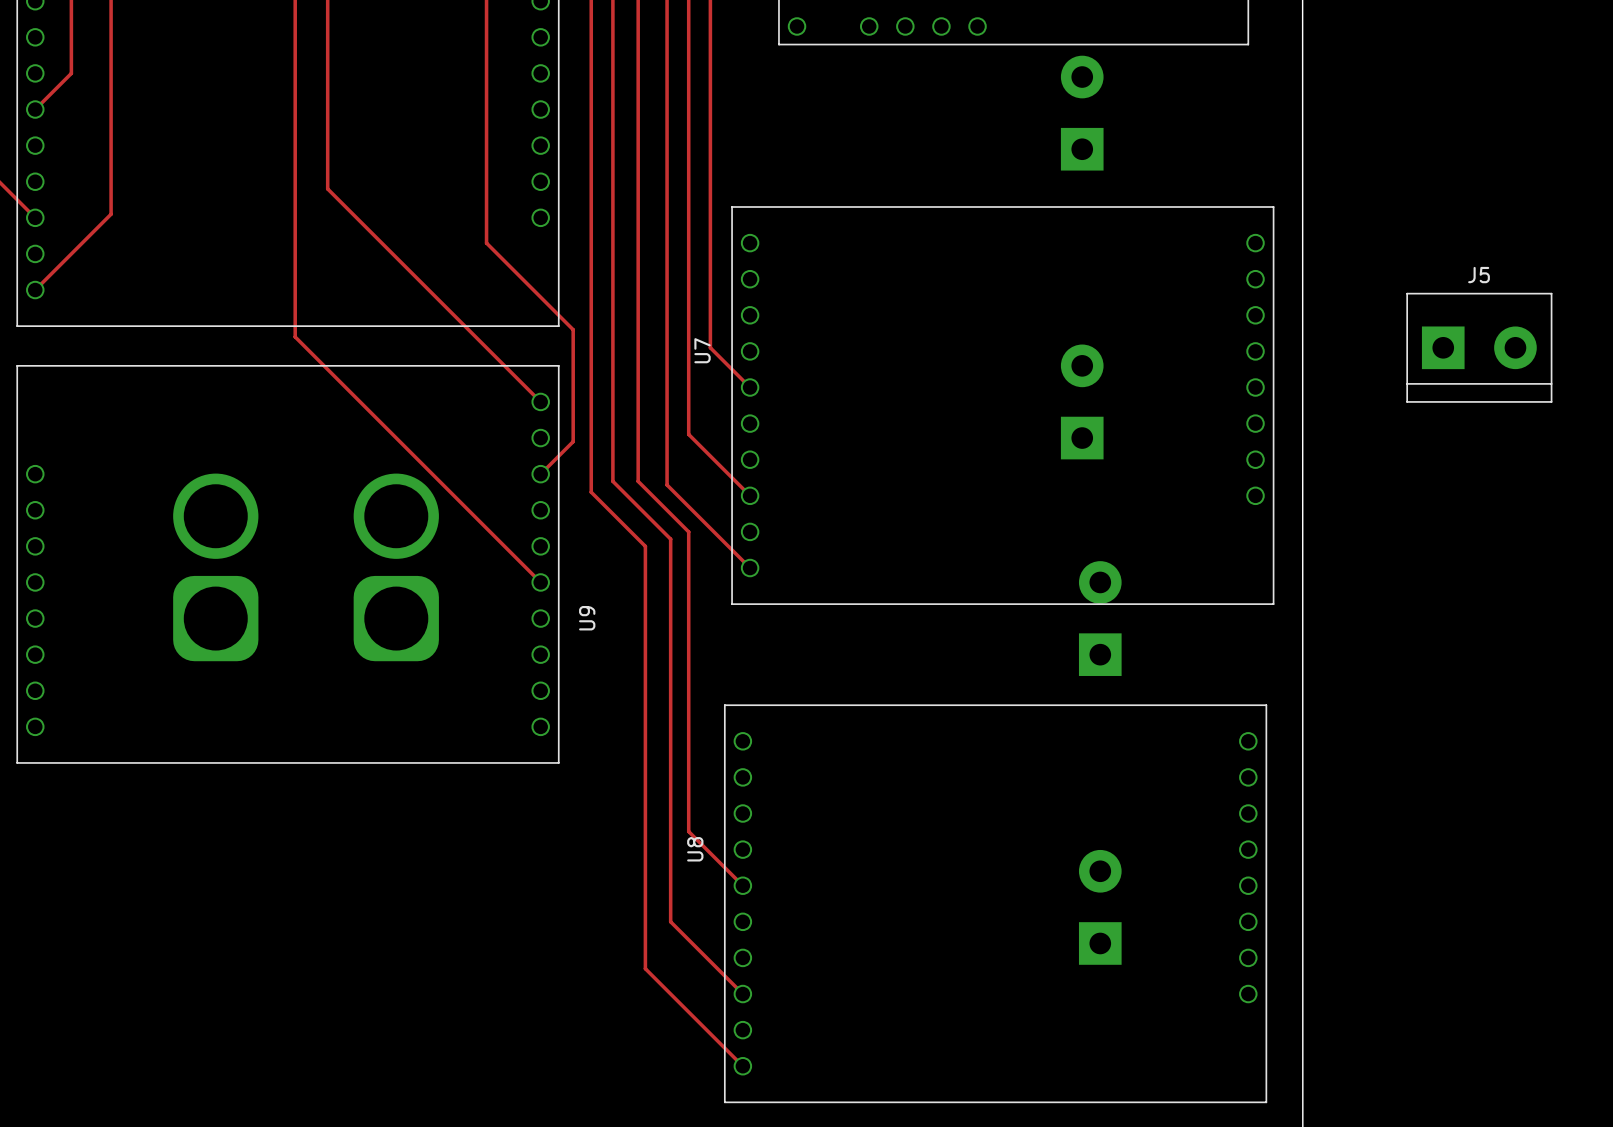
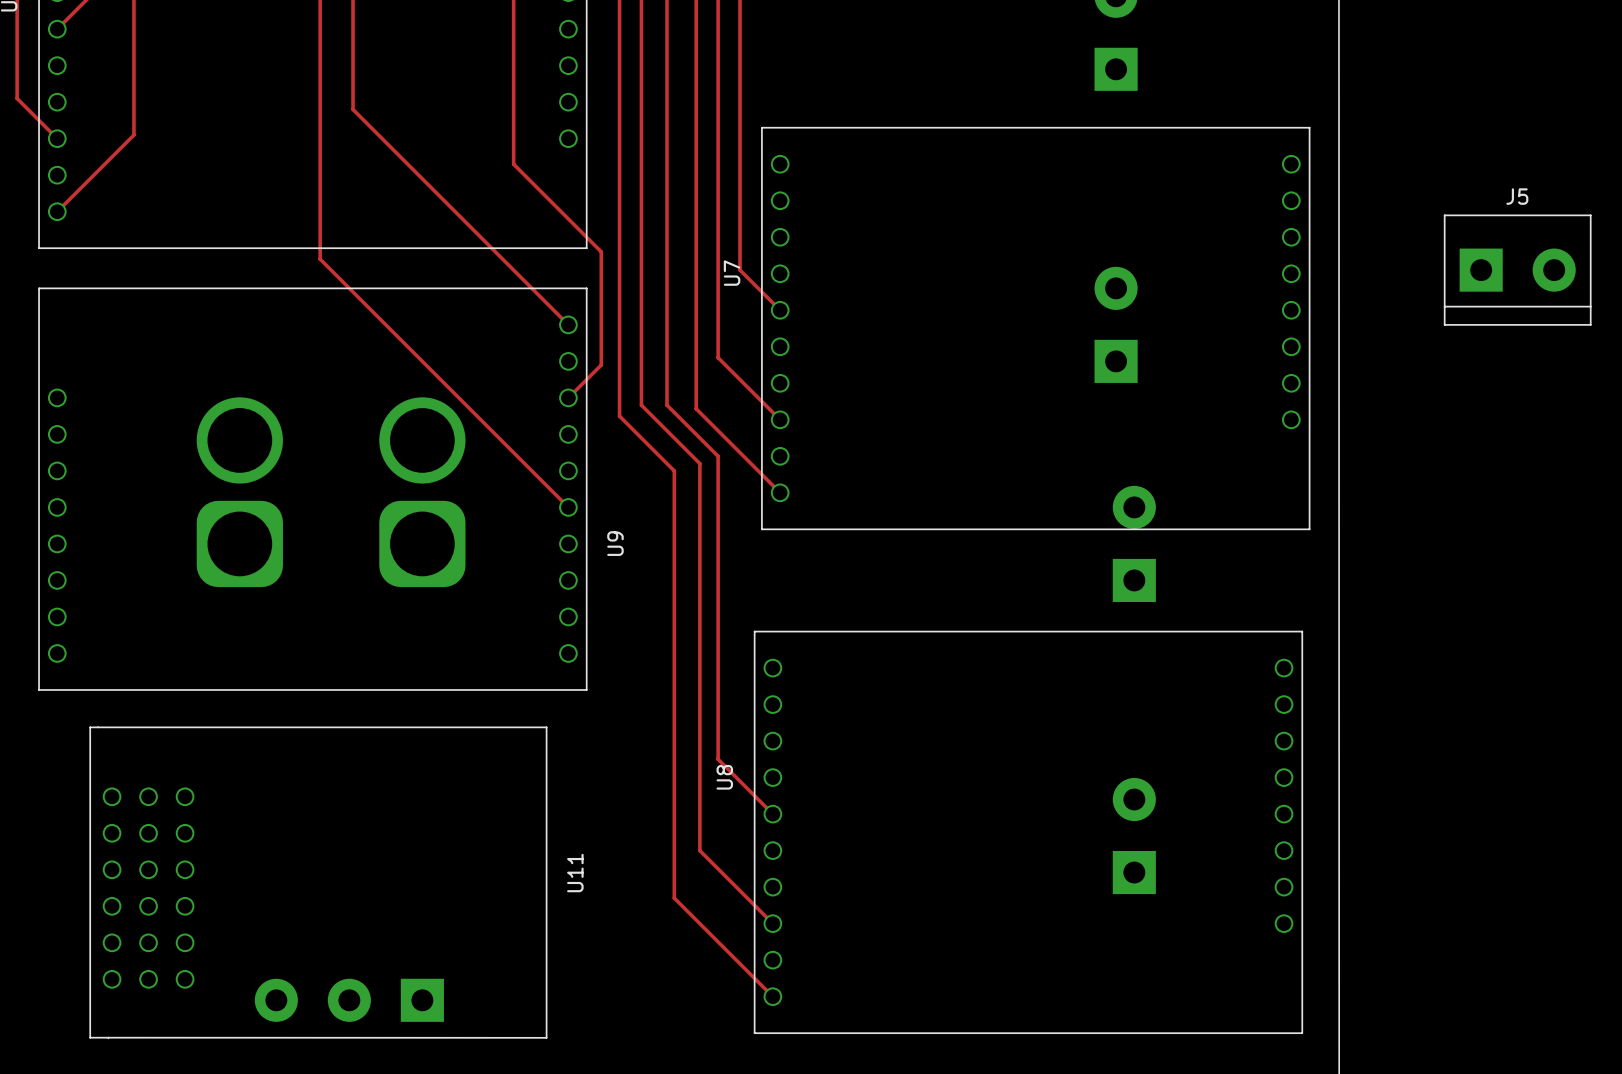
U11: none -> (318, 882)
part: none -> (349, 1000)

